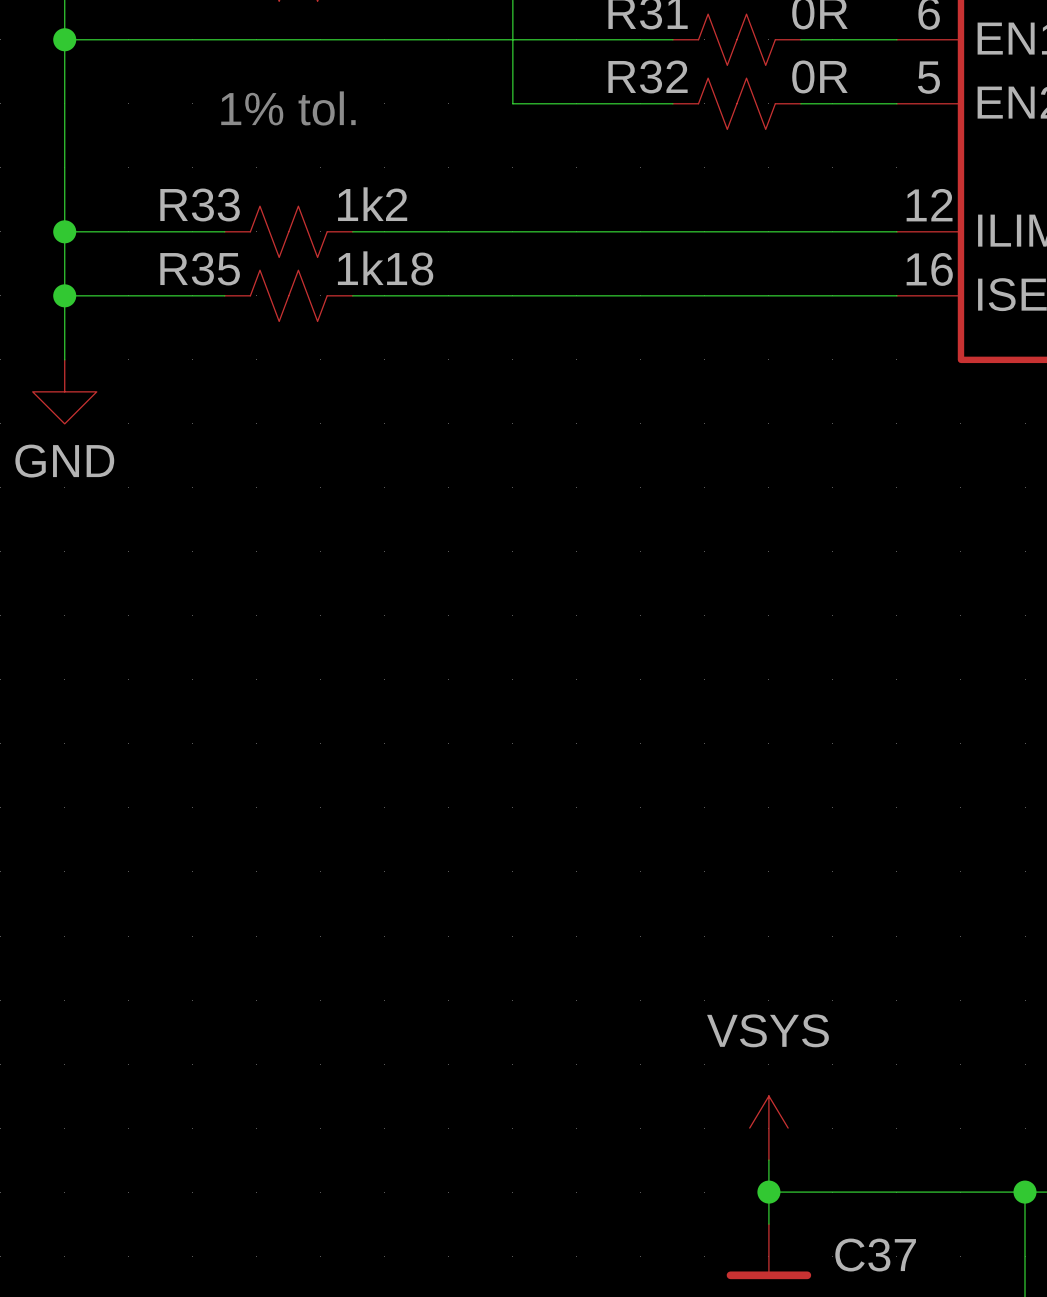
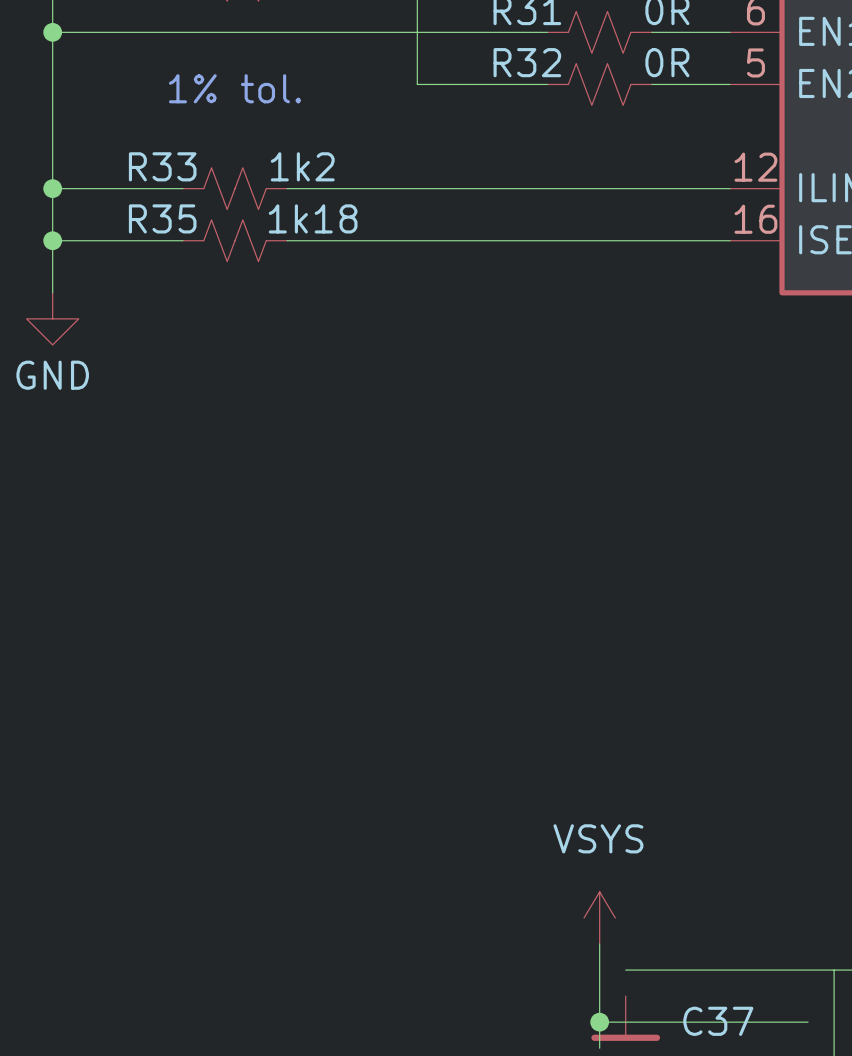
power symbol position: VSYS (768, 1128) -> VSYS (599, 917)
wire: none -> (599, 944) (599, 1048)
wire: (768, 1160) (768, 1224) -> none
junction position: (768, 1192) -> (599, 1022)
junction: (1025, 1192) -> none
wire: none -> (599, 1022) (808, 1022)

